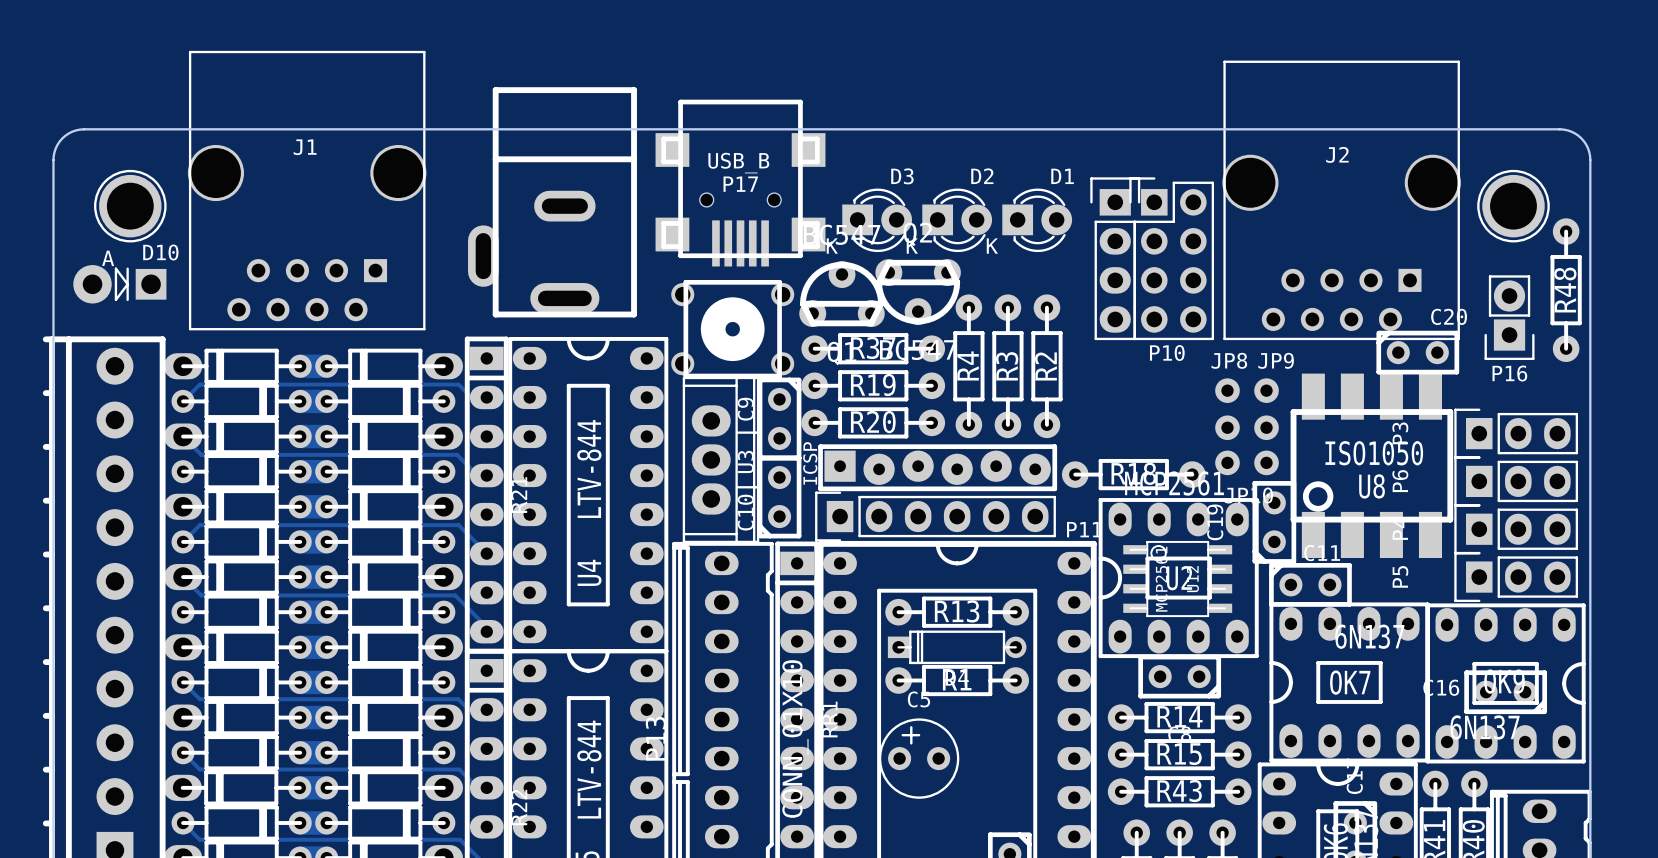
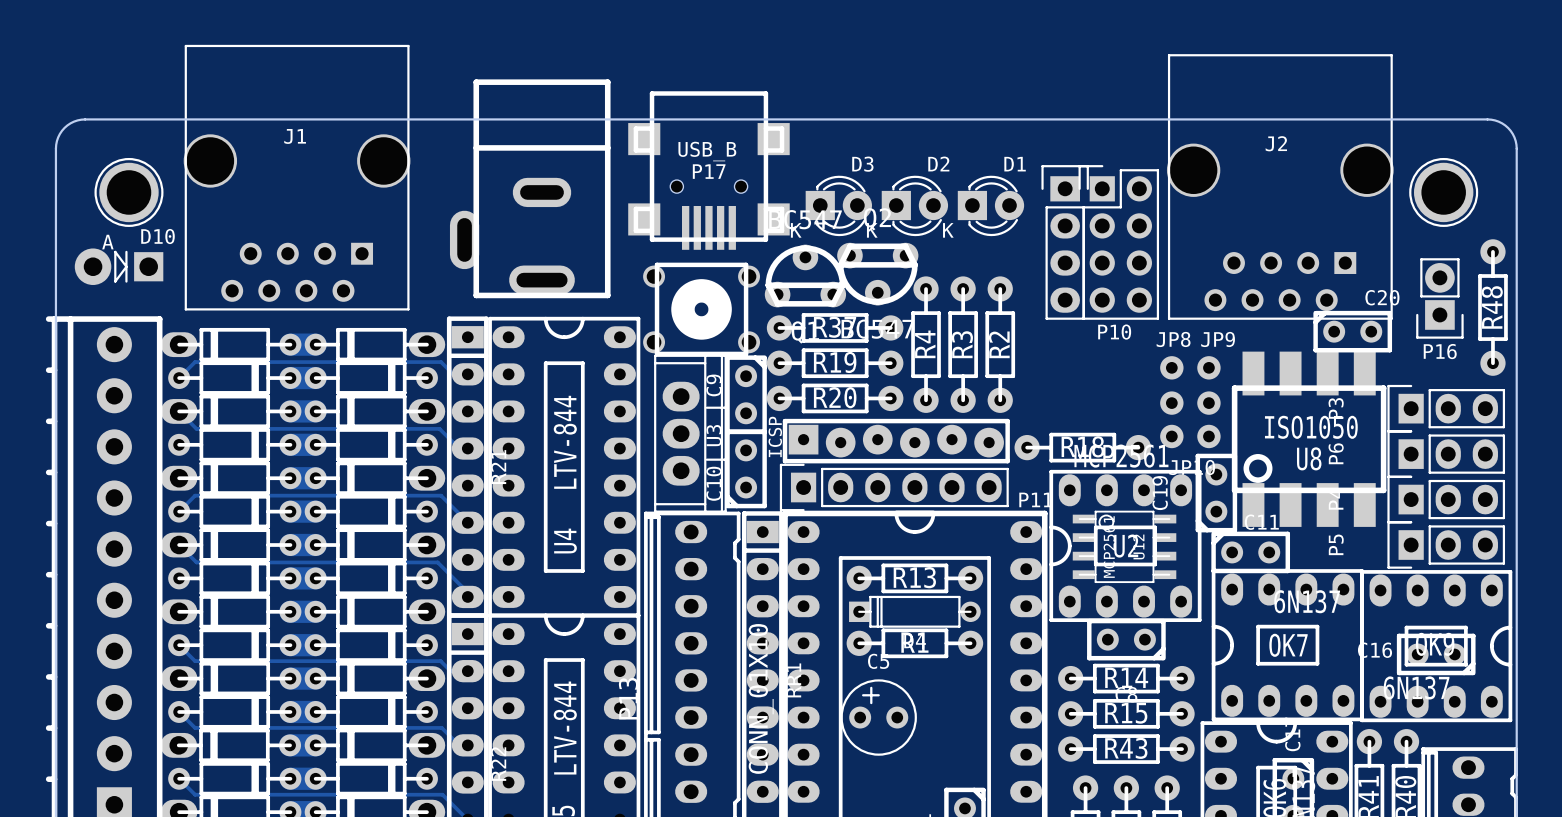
R48 position: (1566, 290) -> (1492, 307)

